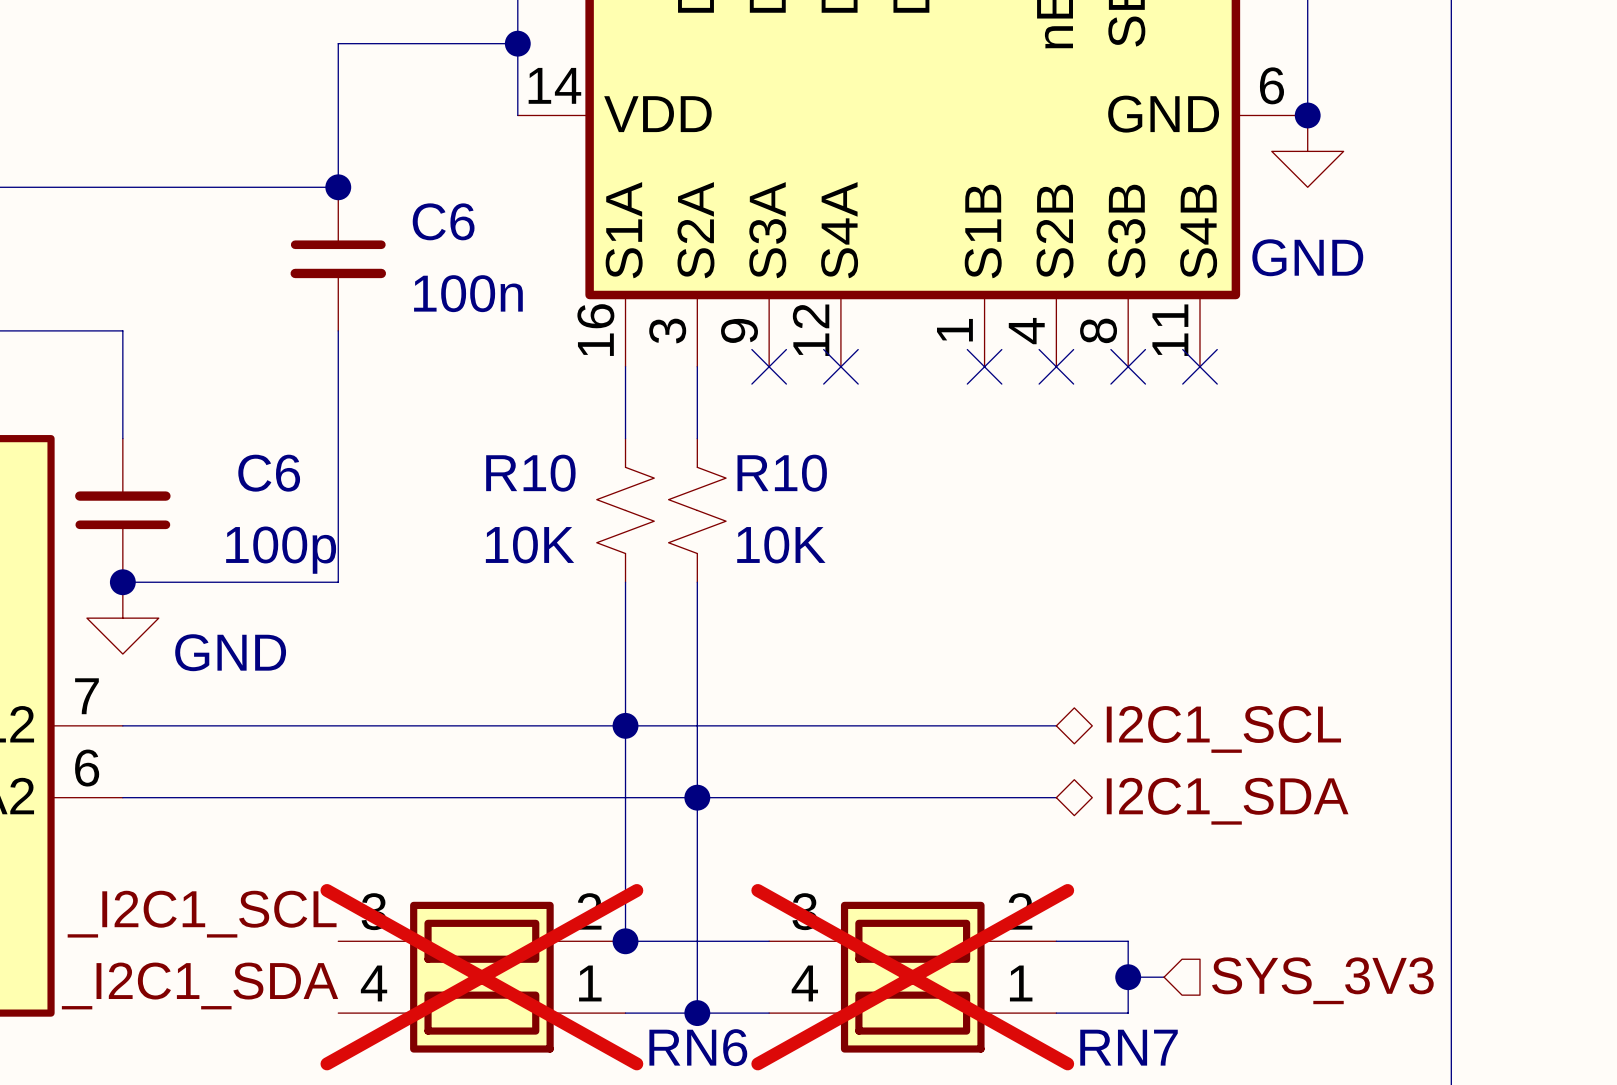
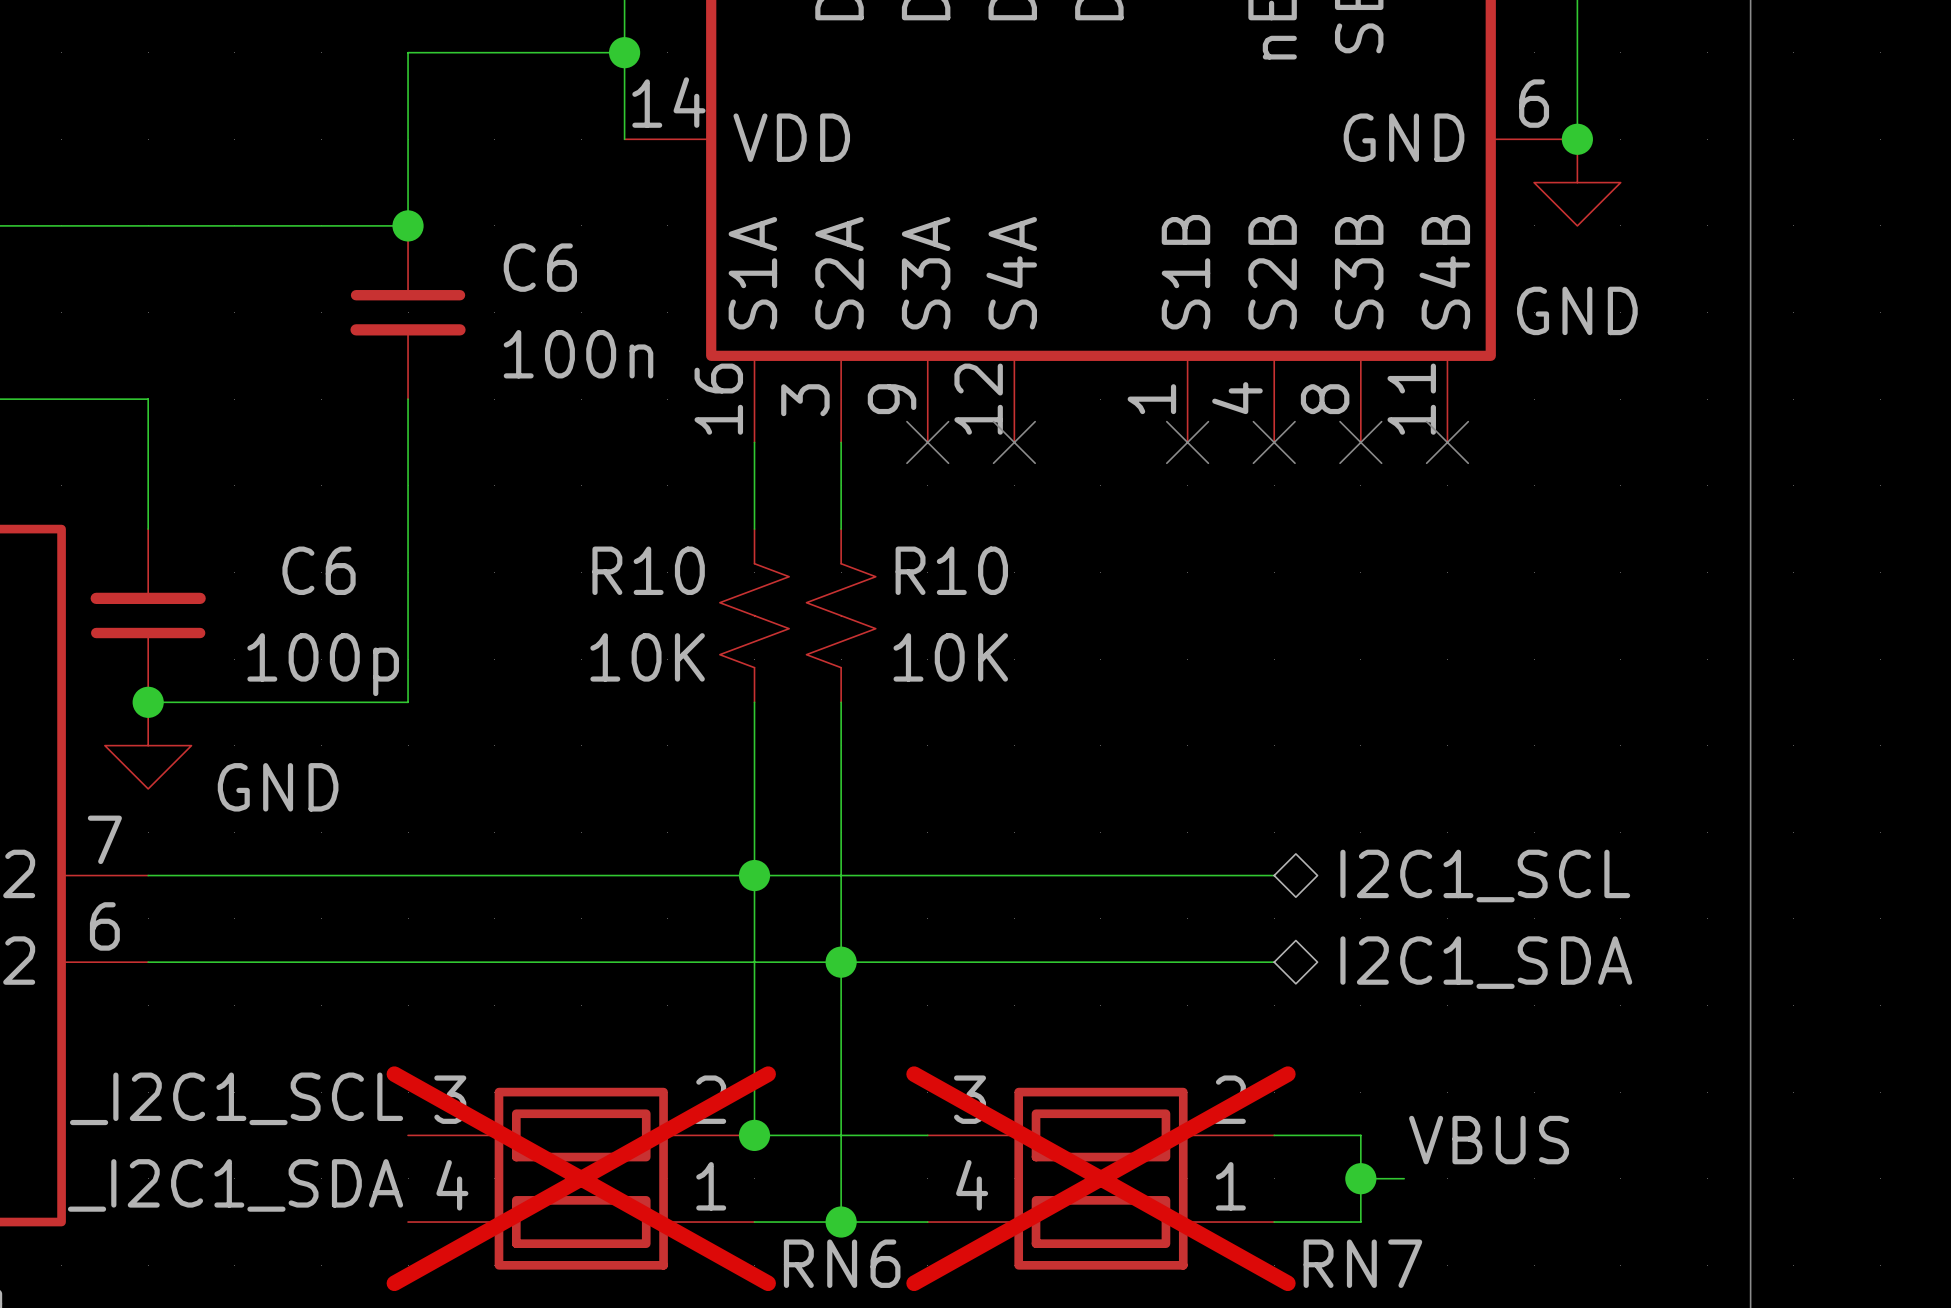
label: none -> VBUS (1489, 1140)
hierarchical label: SYS_3V3 (1322, 980) -> none

